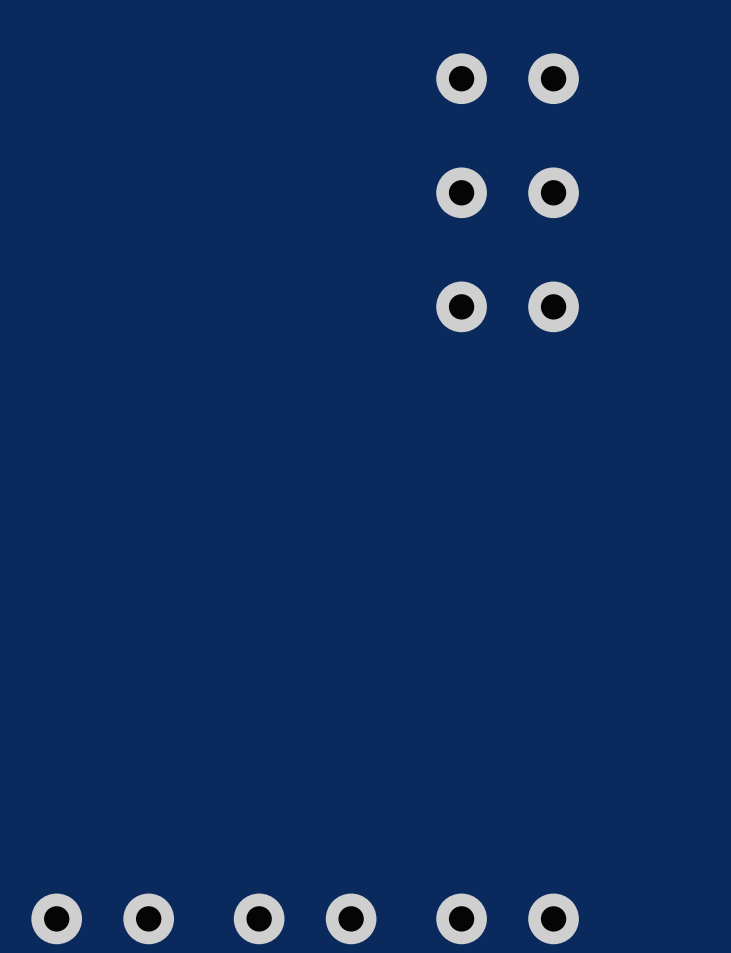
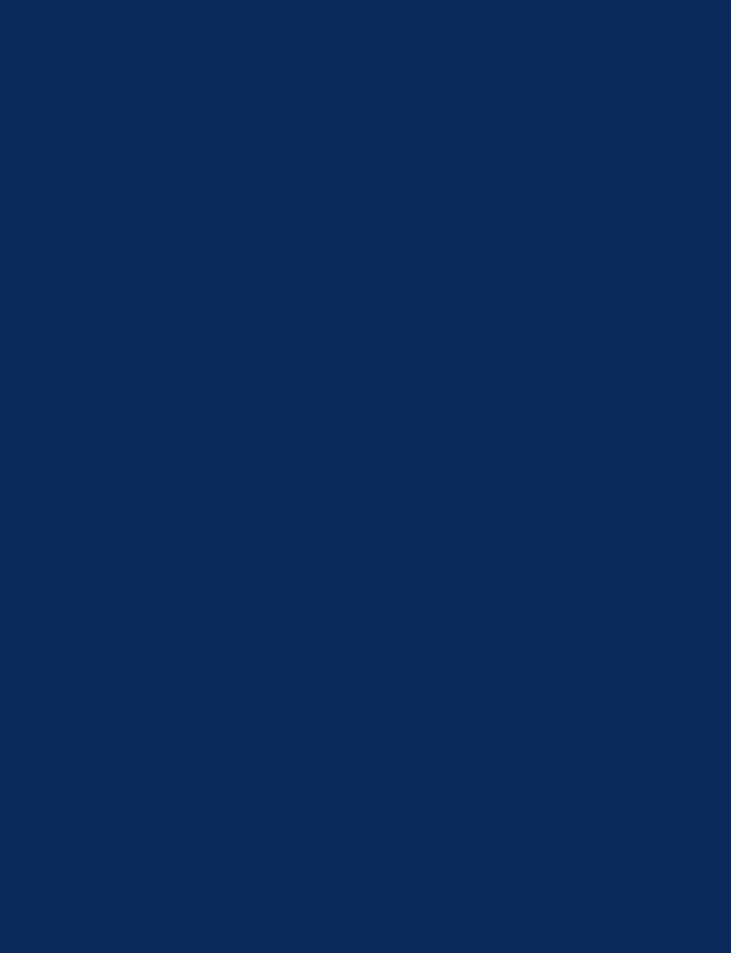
part: (507, 78) -> none
part: (507, 192) -> none
part: (507, 306) -> none
part: (102, 918) -> none
part: (305, 918) -> none
part: (507, 918) -> none

